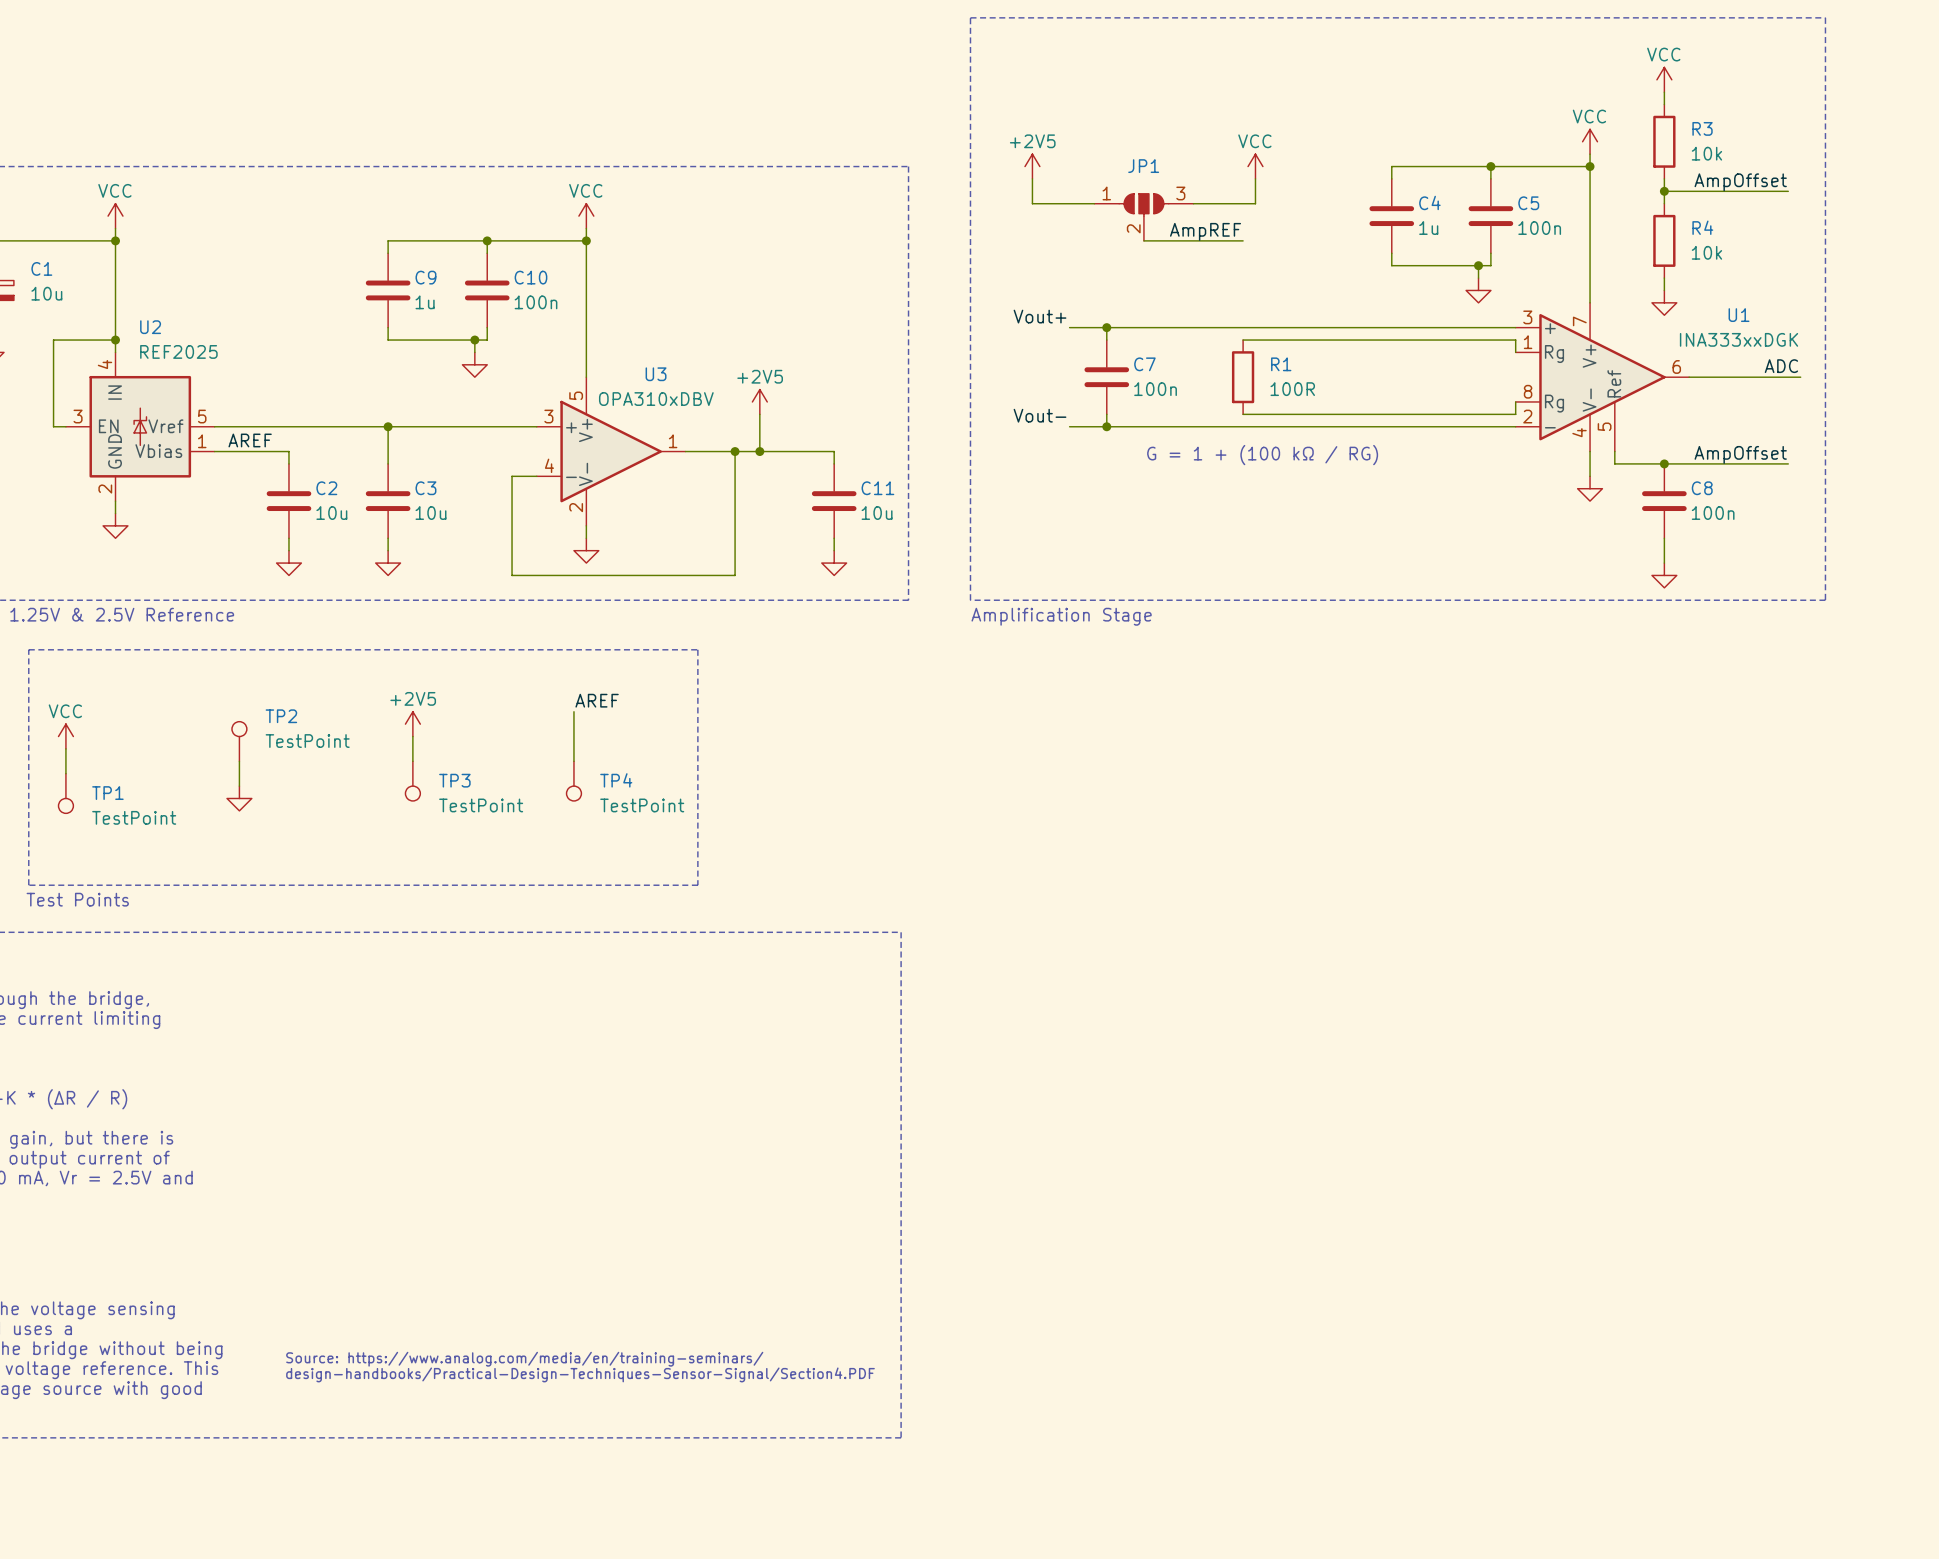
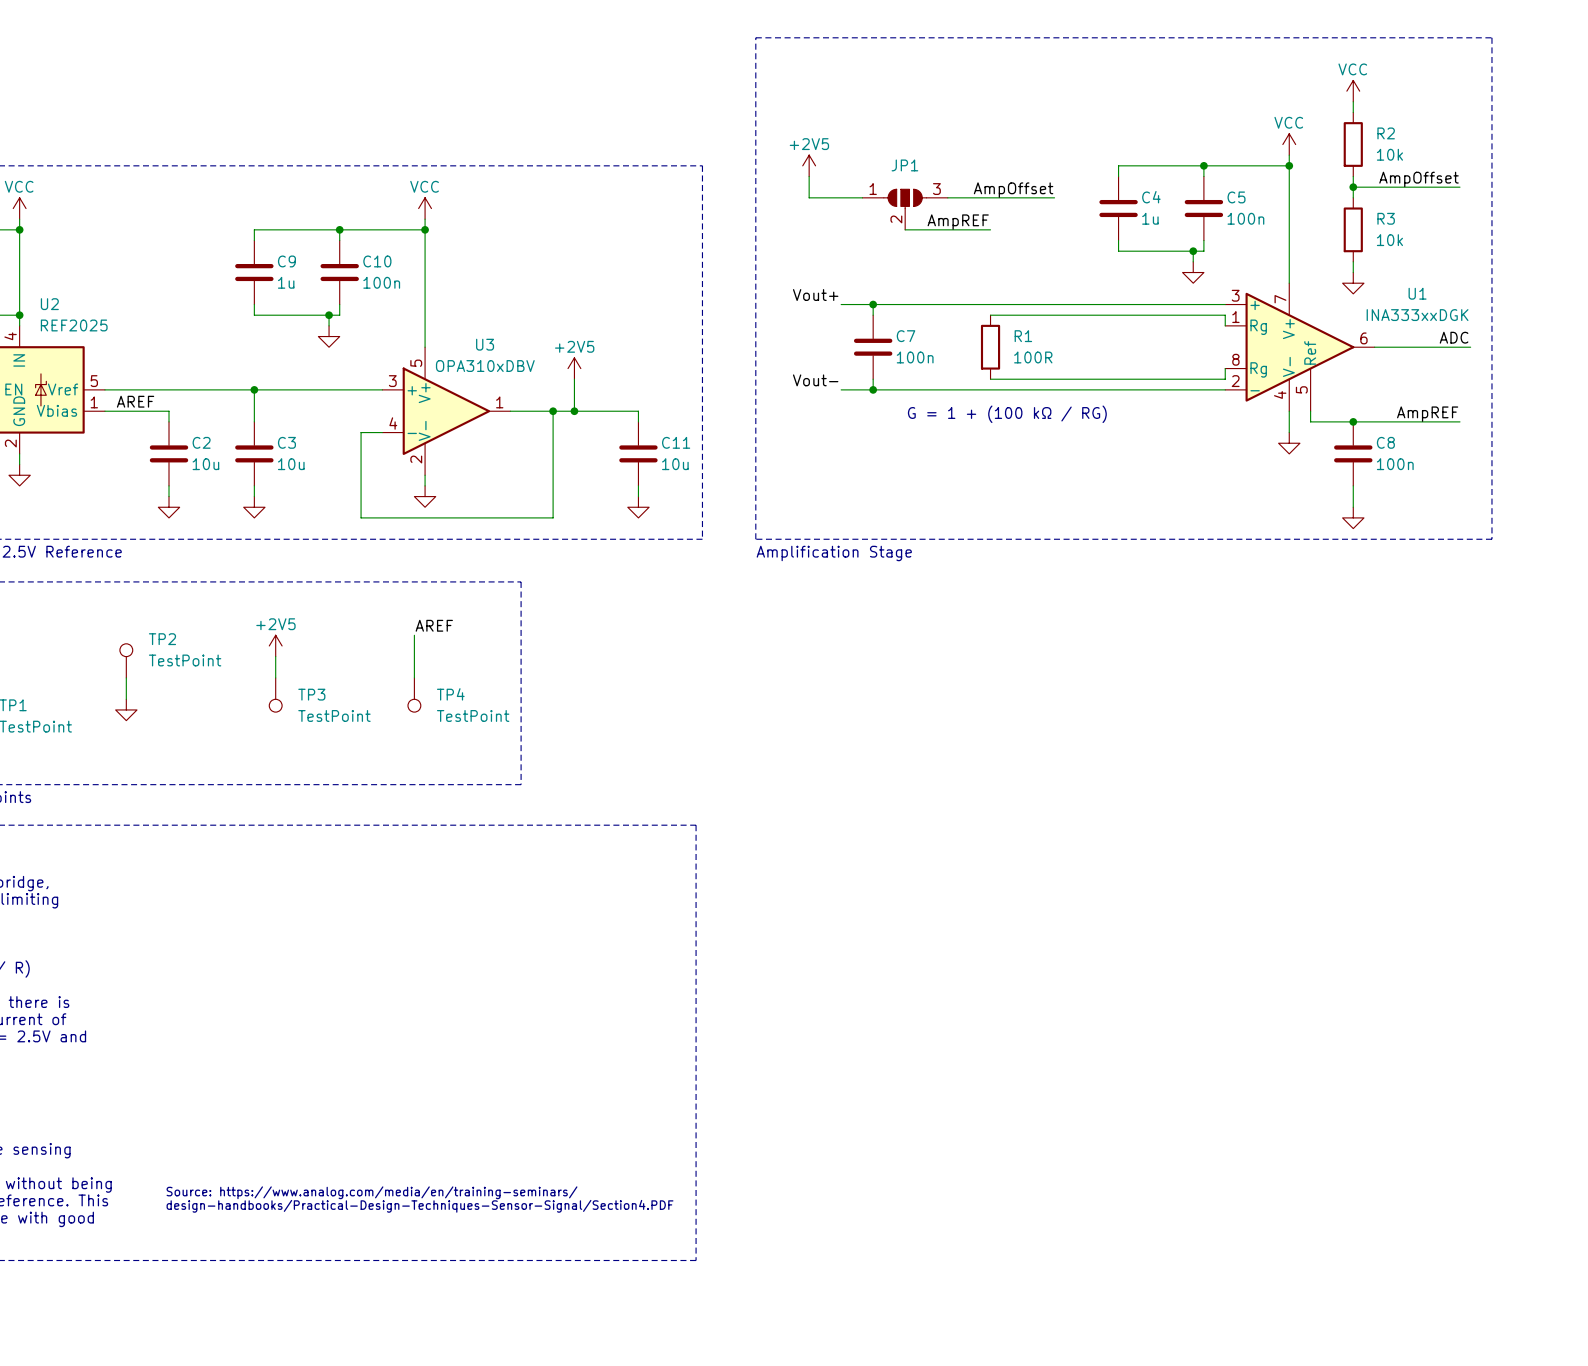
R3 name: R3 (1702, 128) -> R2 (1386, 133)
power symbol: VCC (1255, 166) -> none
wire: (1255, 178) (1255, 203) -> (1054, 197) (1001, 197)
label: none -> AmpOffset (1013, 190)
R4 name: R4 (1702, 227) -> R3 (1386, 218)
label: AmpOffset (1740, 454) -> AmpREF (1427, 414)

